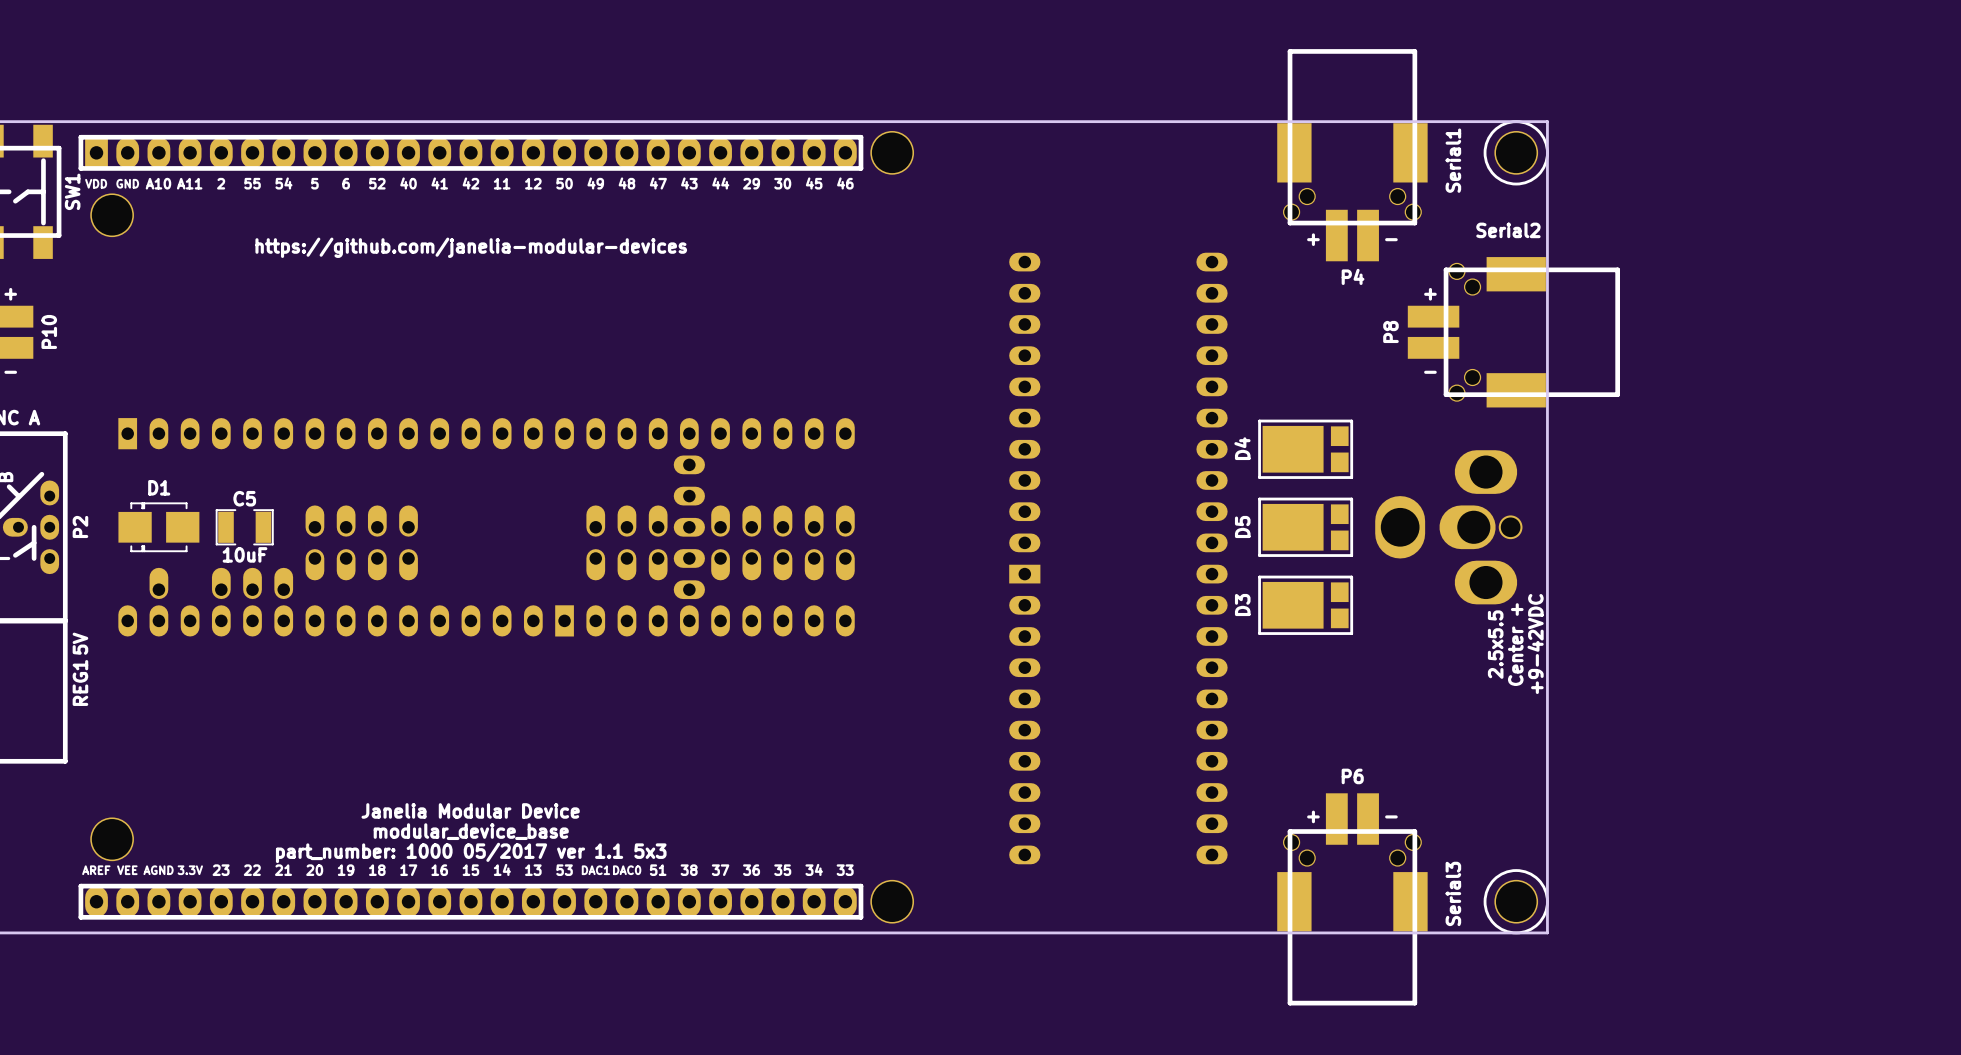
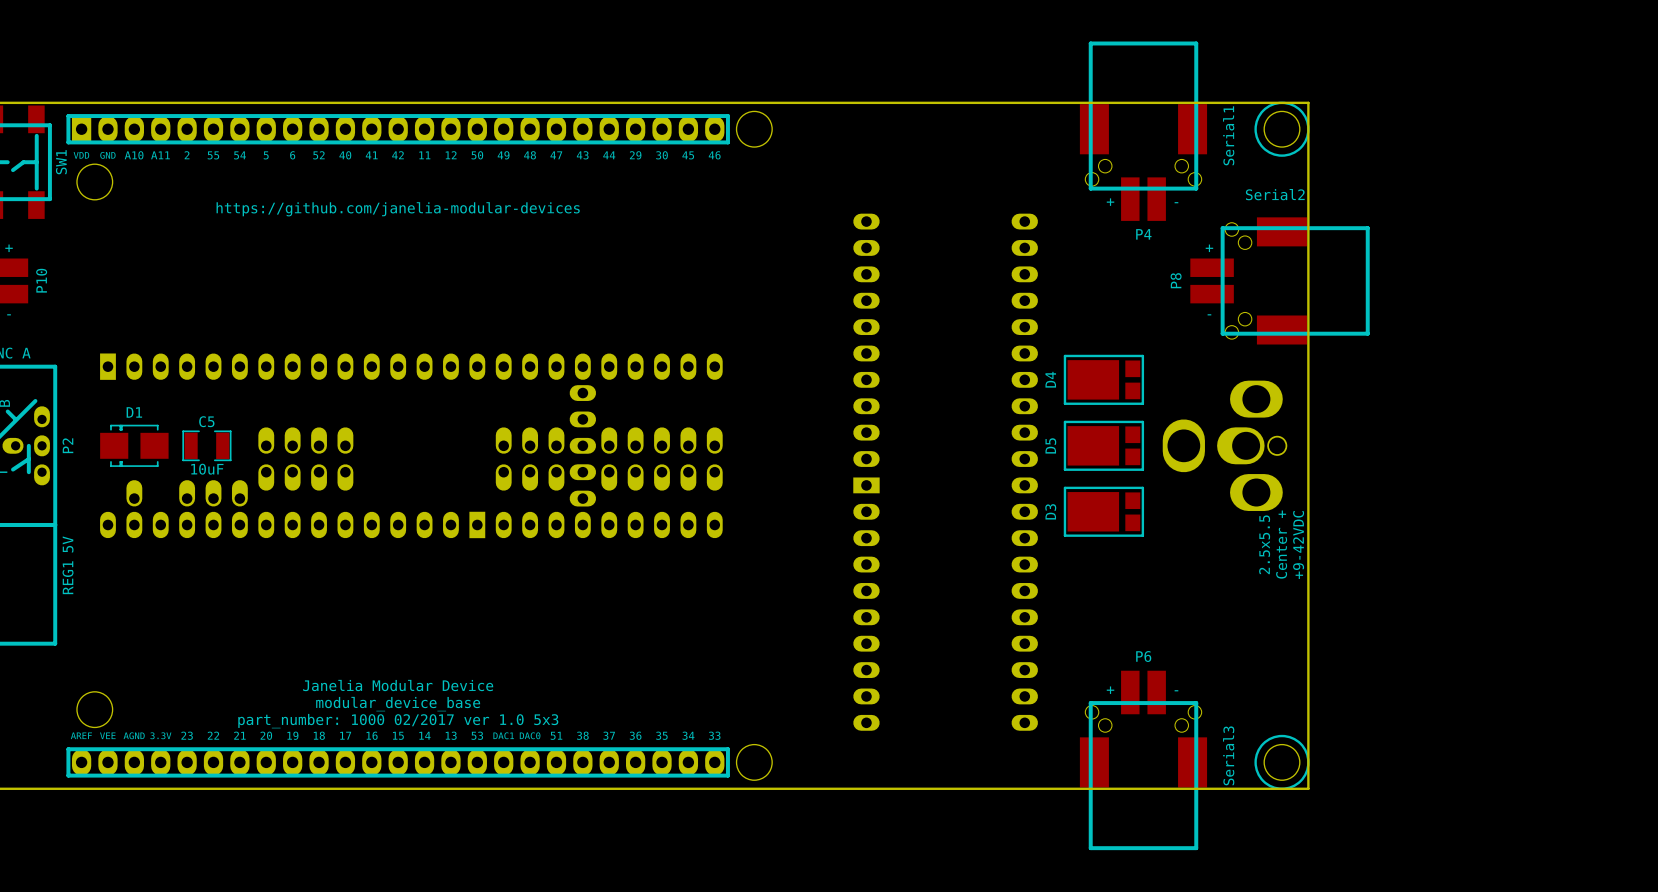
text: part_number: 1000 05/2017 ver 1.1 5x3 (471, 852) -> part_number: 1000 02/2017 ver 1.0 5x3 (398, 721)

